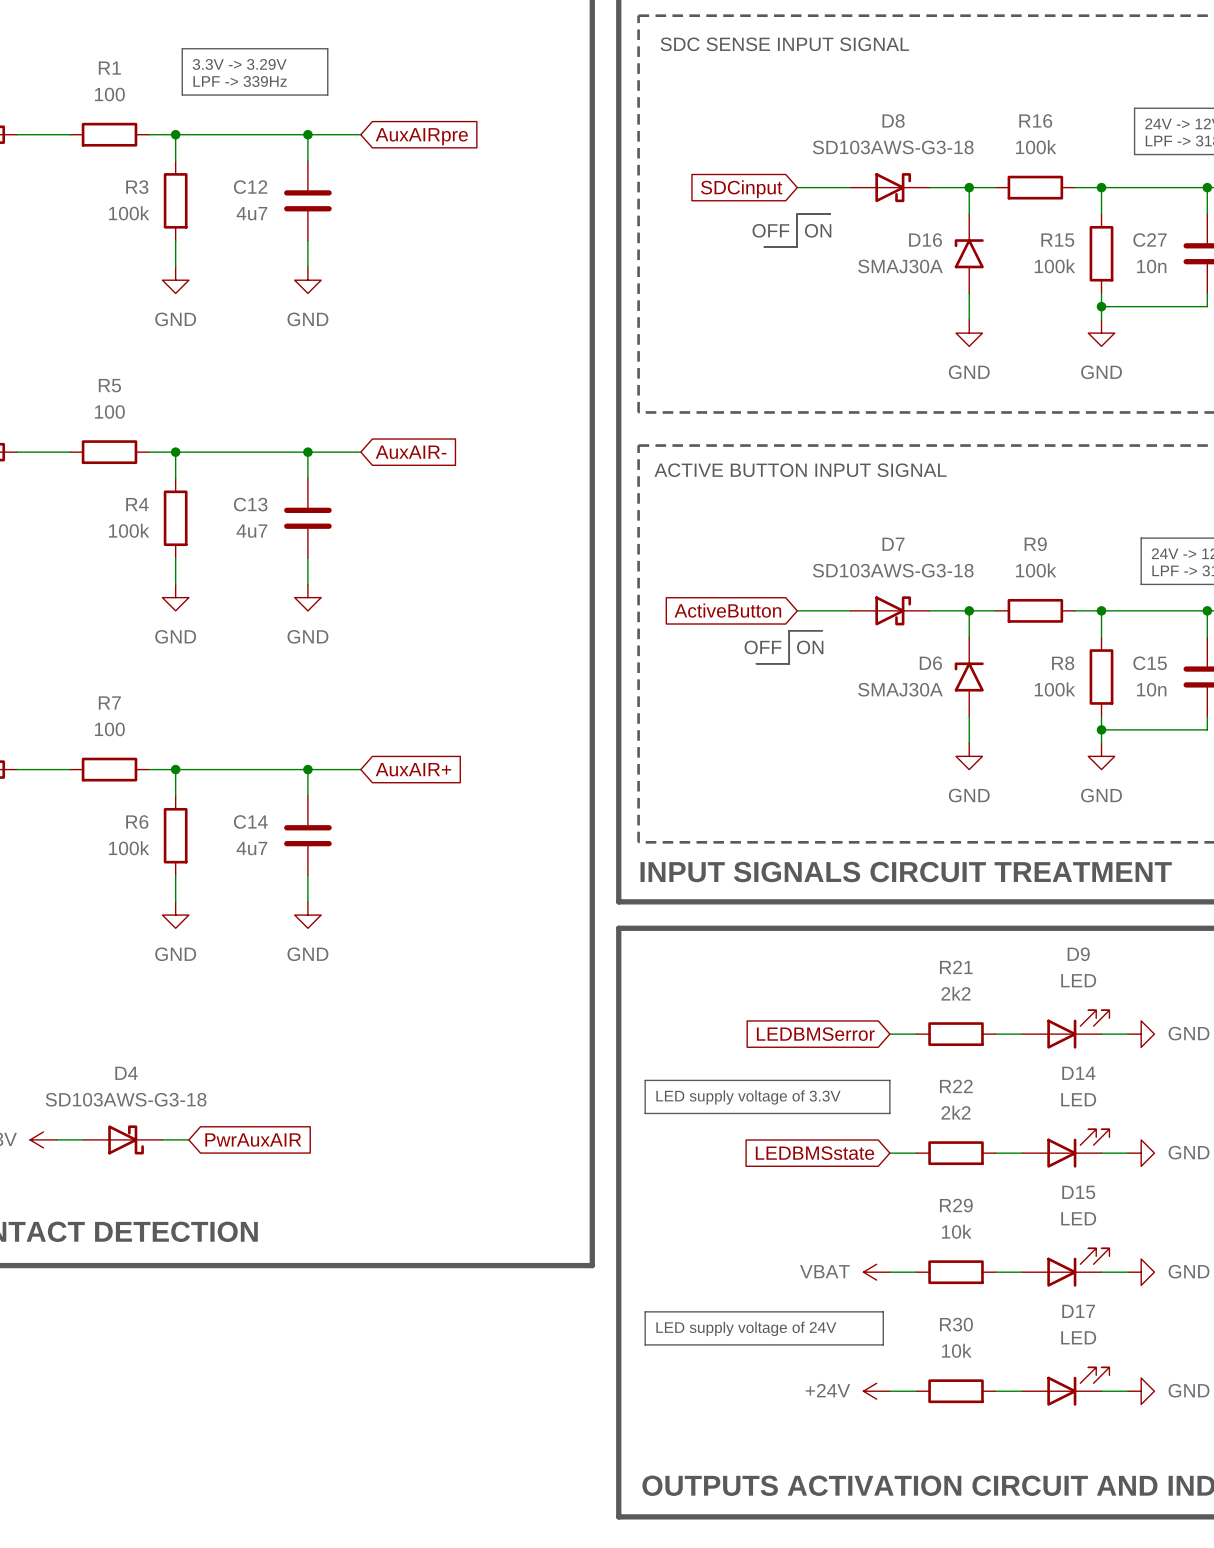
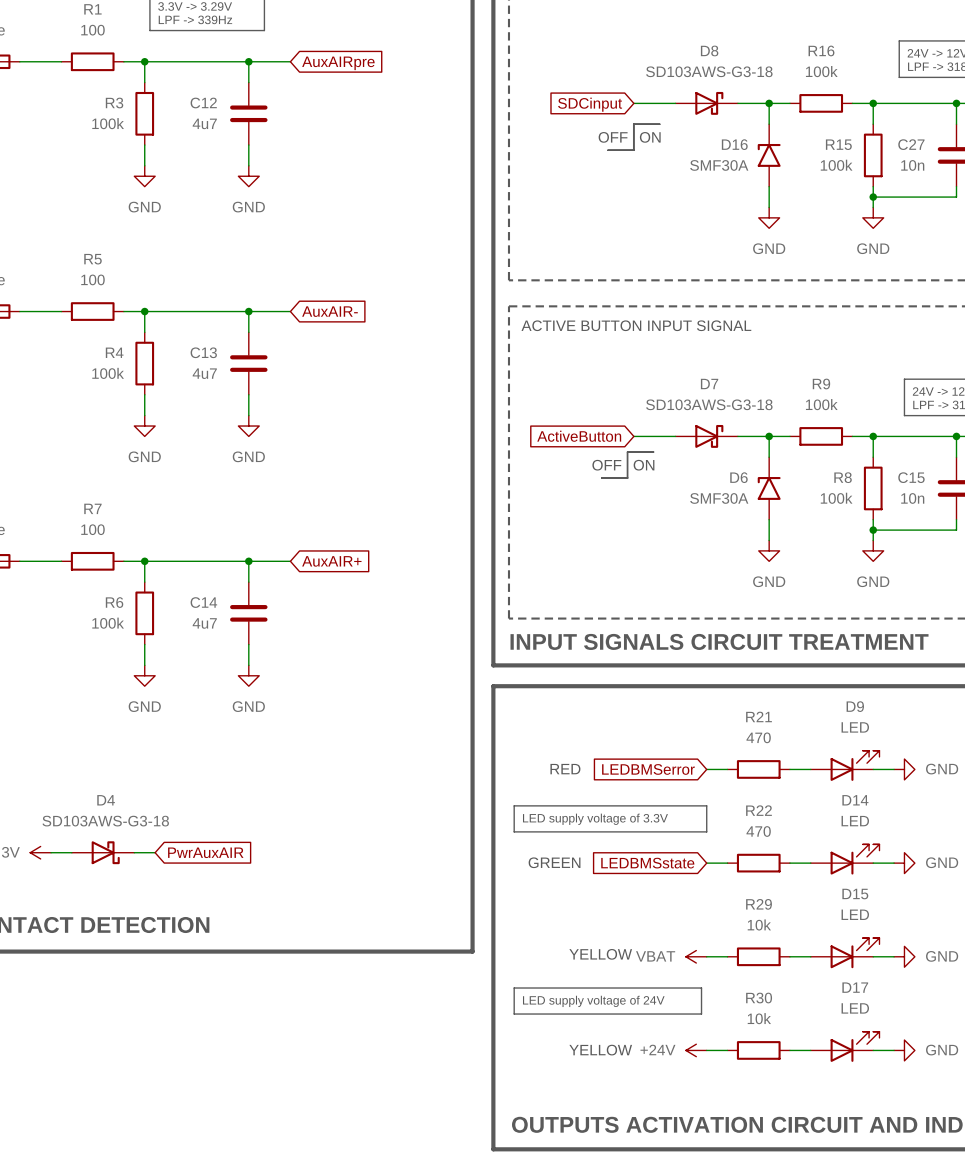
D16 value: SMAJ30A (900, 266) -> SMF30A (719, 165)
D6 value: SMAJ30A (900, 689) -> SMF30A (719, 498)
R21 value: 2k2 (956, 993) -> 470 (758, 737)
text: none -> RED (565, 769)
R22 value: 2k2 (956, 1112) -> 470 (758, 831)
text: none -> GREEN (554, 862)
text: none -> YELLOW (600, 954)
text: none -> YELLOW (600, 1050)

